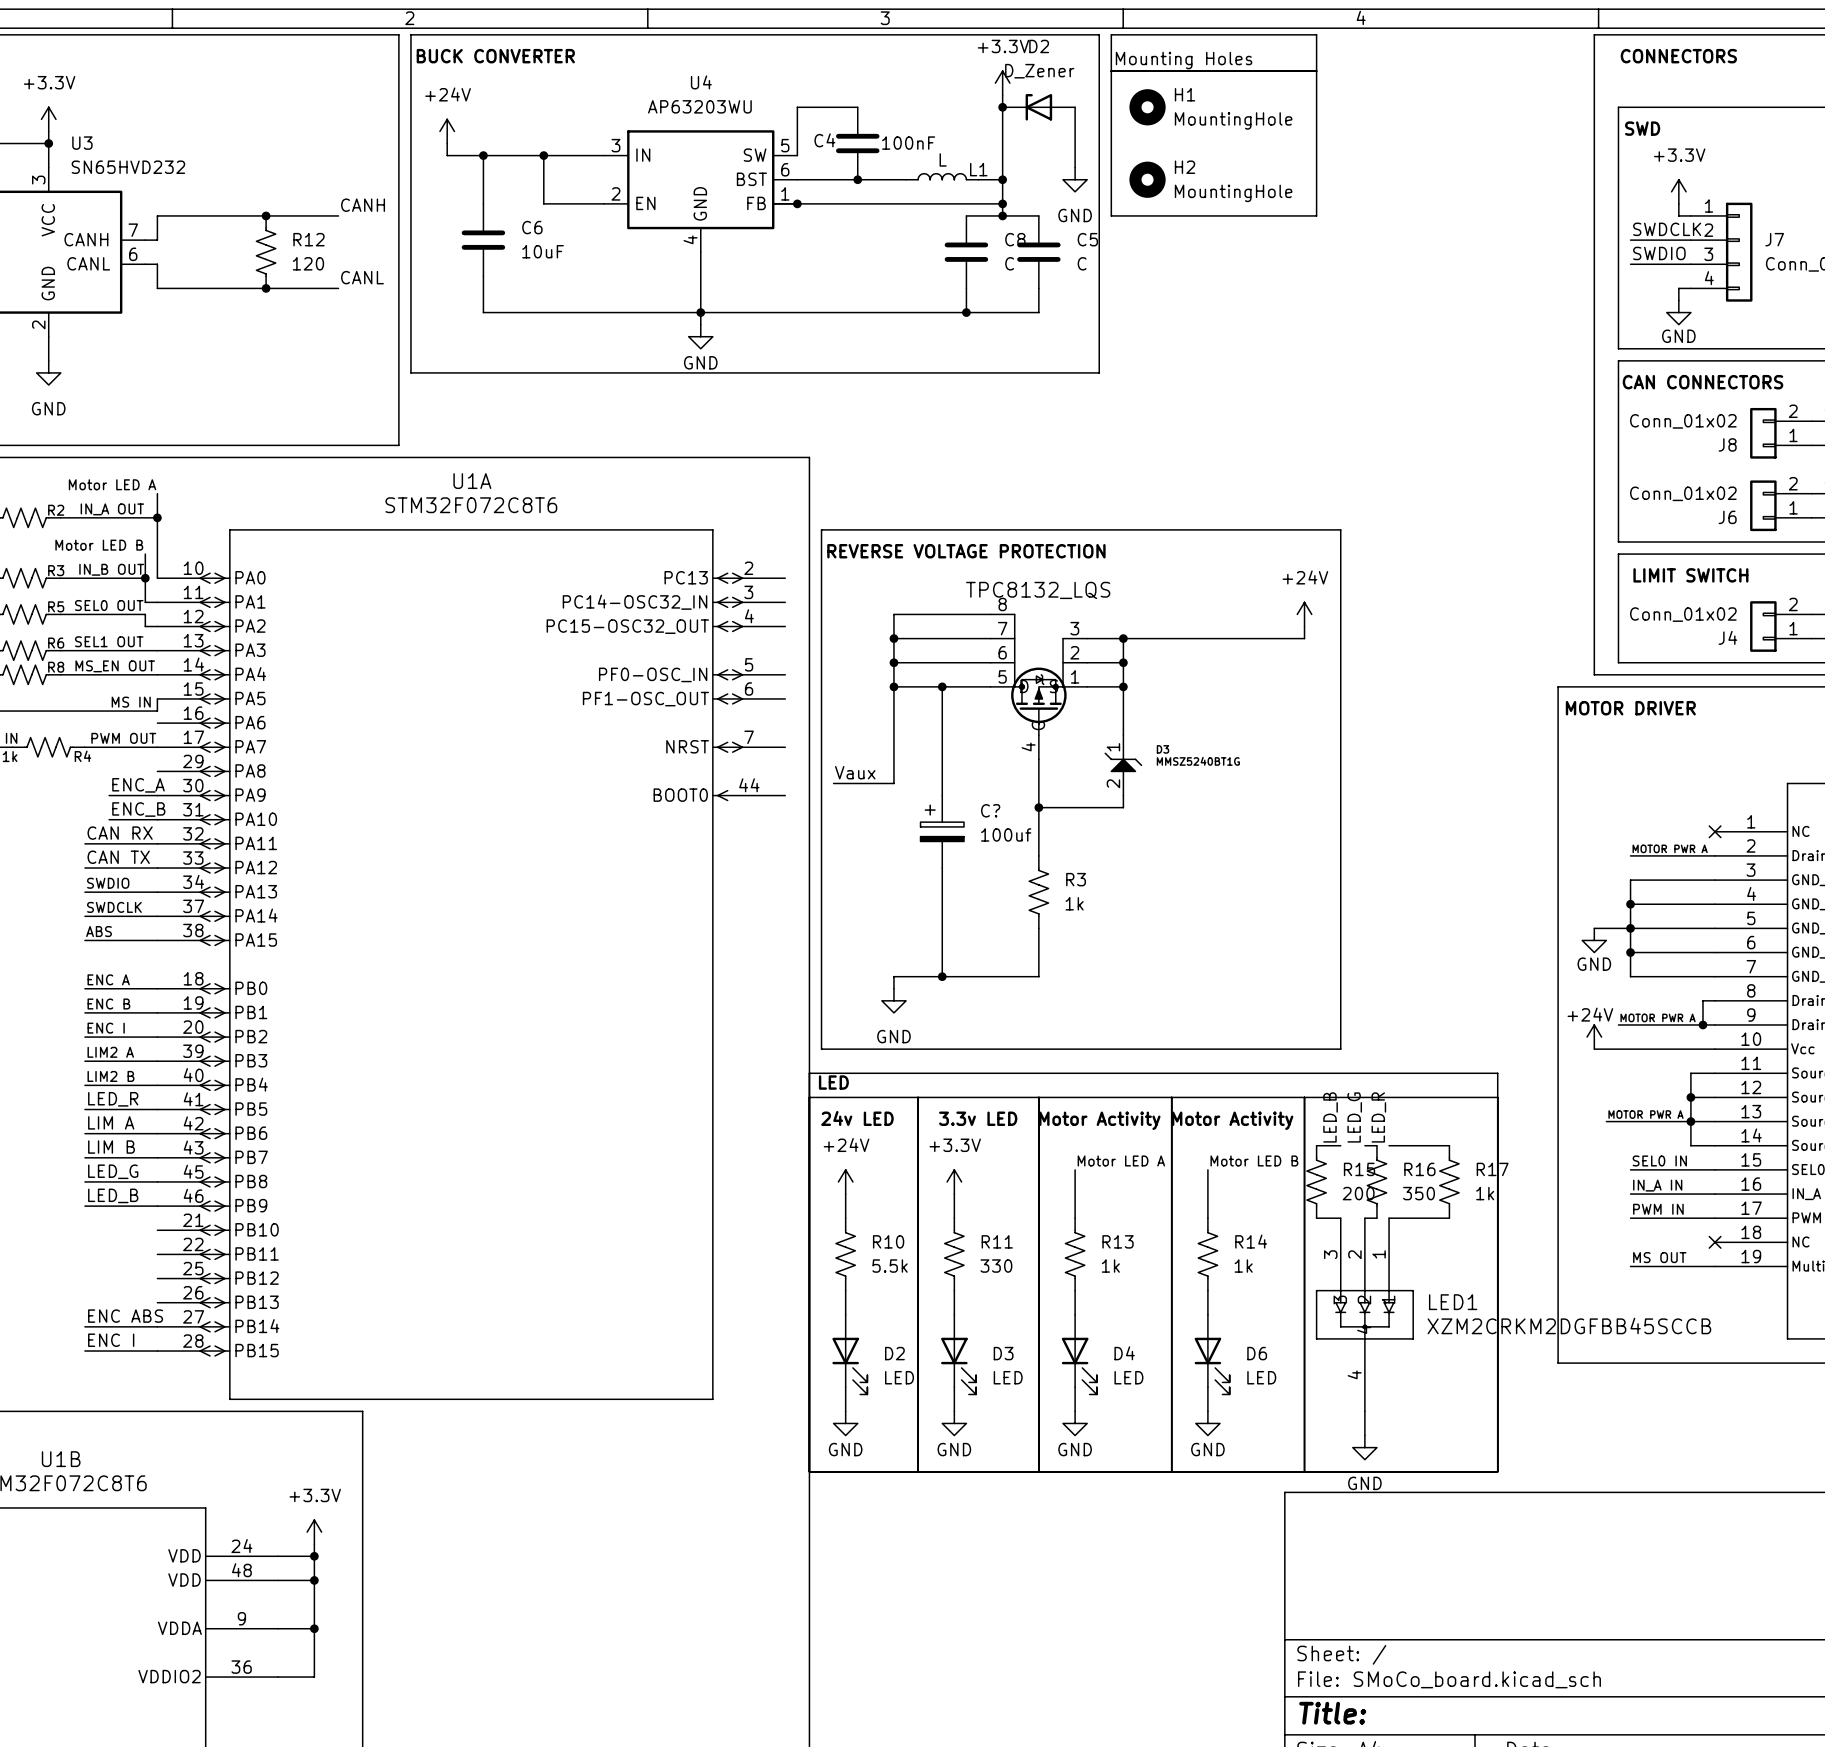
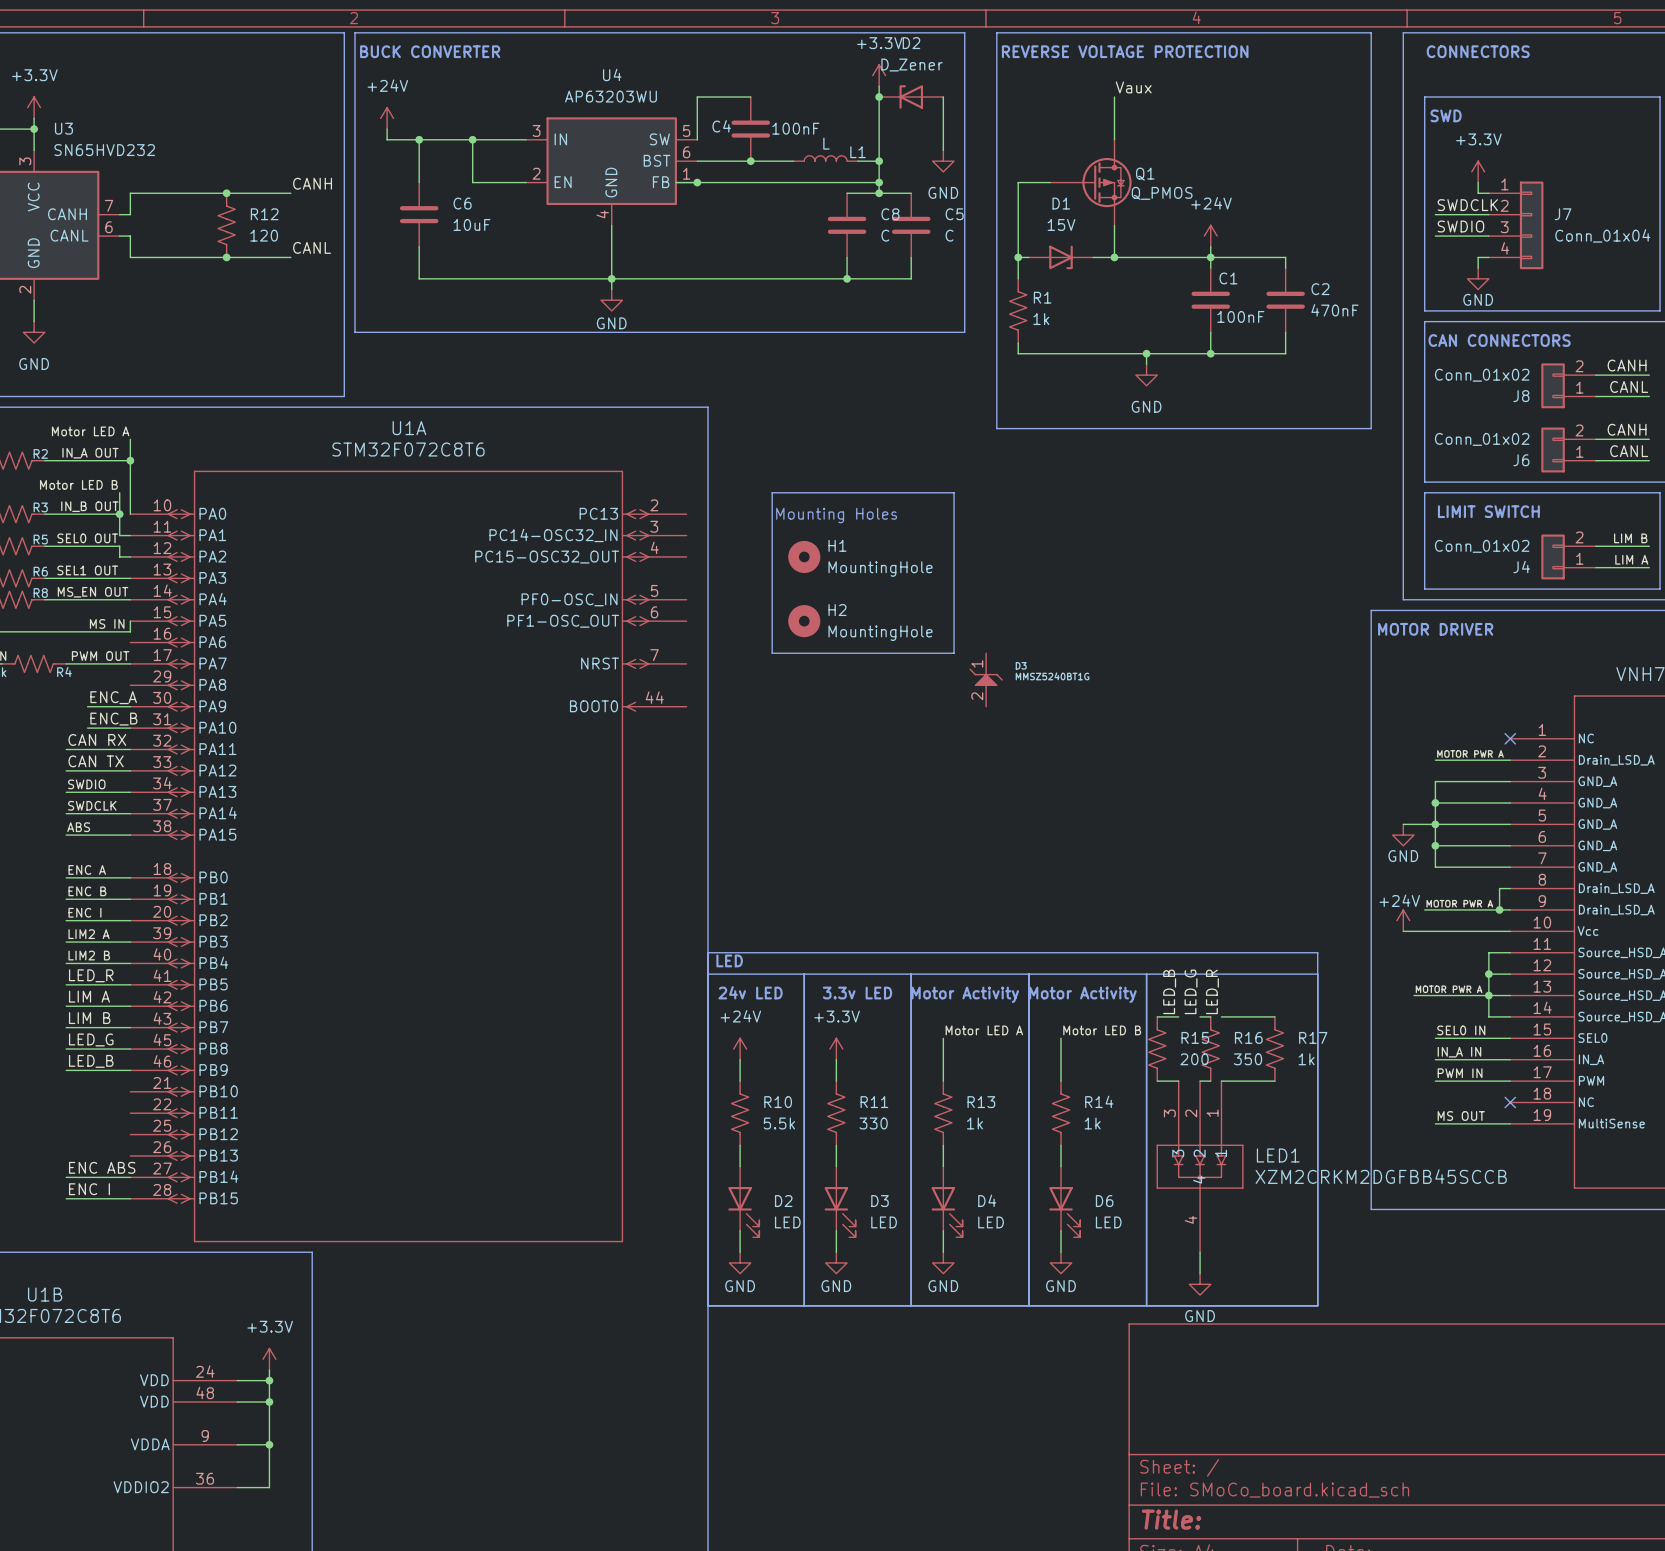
line: (1135, 34) (1111, 34) (1111, 215) (1316, 215) (1316, 34) -> (996, 32) (996, 428) (1371, 428) (1371, 32) (1157, 32)
text: none -> REVERSE VOLTAGE PROTECTION (1125, 51)
text: Mounting Holes (1184, 60) -> none
line: (1111, 71) (1316, 71) -> none
label: none -> Vaux (1133, 87)
H1 position: (1147, 107) -> (804, 556)
wire: none -> (1114, 97) (1114, 139)
H2 position: (1147, 179) -> (804, 621)
wire: none -> (1050, 182) (1018, 182) (1018, 278)
Q1: none -> Q_PMOS (1090, 182)
wire: none -> (1114, 225) (1114, 257)
power symbol: none -> +24V (1210, 236)
wire: none -> (1210, 246) (1210, 268)
wire: none -> (1018, 257) (1028, 257)
junction: none -> (1018, 257)
D1: none -> 15V (1061, 257)
wire: none -> (1093, 257) (1285, 257) (1285, 268)
junction: none -> (1114, 257)
junction: none -> (1210, 257)
C1: none -> 100nF (1210, 300)
C2: none -> 470nF (1285, 300)
R1: none -> 1k (1018, 310)
wire: none -> (1210, 332) (1210, 353)
wire: none -> (1285, 332) (1285, 353) (1018, 353) (1018, 343)
wire: none -> (1146, 353) (1146, 364)
junction: none -> (1146, 353)
junction: none -> (1210, 353)
power symbol: none -> GND (1146, 375)
line: (821, 529) (1340, 529) (1340, 1049) (821, 1049) (821, 529) -> none
text: REVERSE VOLTAGE PROTECTION (966, 551) -> none
line: none -> (772, 492) (954, 492) (954, 653) (772, 653) (772, 492)
text: none -> Mounting Holes (836, 515)
wire: (990, 614) (893, 614) (893, 783) (833, 783) -> none
power symbol: +24V (1304, 614) -> none
wire: (1304, 626) (1304, 638) (1087, 638) -> none
wire: (893, 638) (990, 638) -> none
junction: (893, 638) -> none
wire: (1123, 638) (1123, 735) -> none
junction: (1123, 638) -> none
wire: (893, 662) (990, 662) -> none
junction: (893, 662) -> none
wire: (1087, 662) (1123, 662) -> none
junction: (1123, 662) -> none
wire: (893, 686) (990, 686) -> none
junction: (893, 686) -> none
wire: (942, 686) (942, 795) -> none
junction: (942, 686) -> none
part: TPC8132_LQS (1038, 686) -> none
wire: (1087, 686) (1123, 686) -> none
junction: (1123, 686) -> none
wire: (1038, 759) (1038, 855) -> none
label: Vaux (855, 772) -> none
wire: (1123, 795) (1123, 807) (1038, 807) -> none
junction: (1038, 807) -> none
C?: 100uf (942, 831) -> none
wire: (942, 868) (942, 976) -> none
R3: 1k (1038, 892) -> none
wire: (1038, 928) (1038, 976) (893, 976) (893, 988) -> none
junction: (942, 976) -> none
power symbol: GND (893, 1000) -> none

